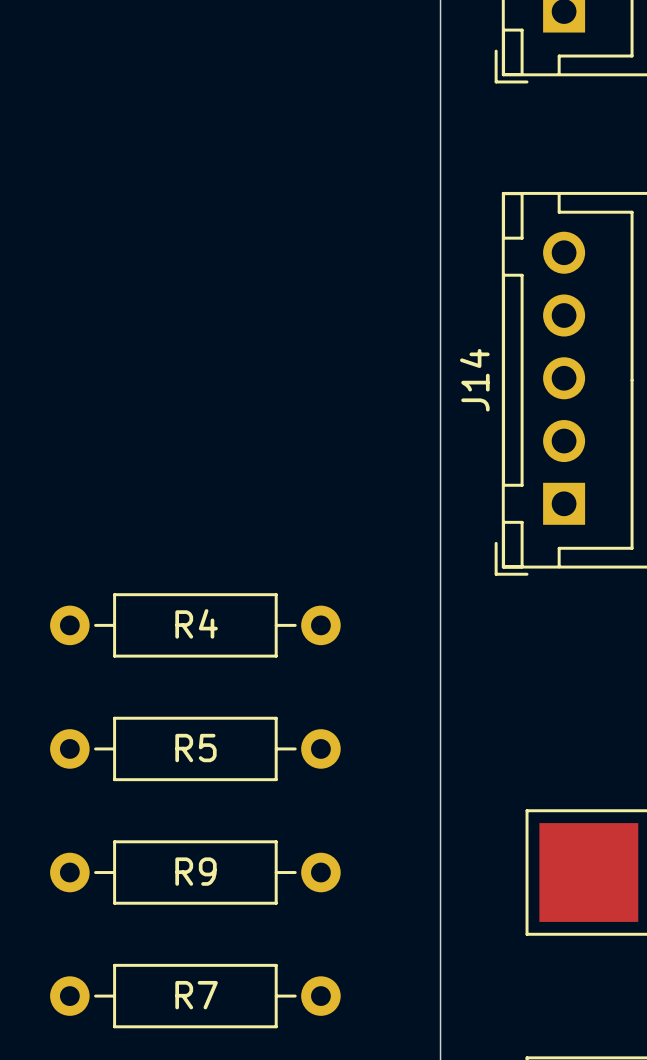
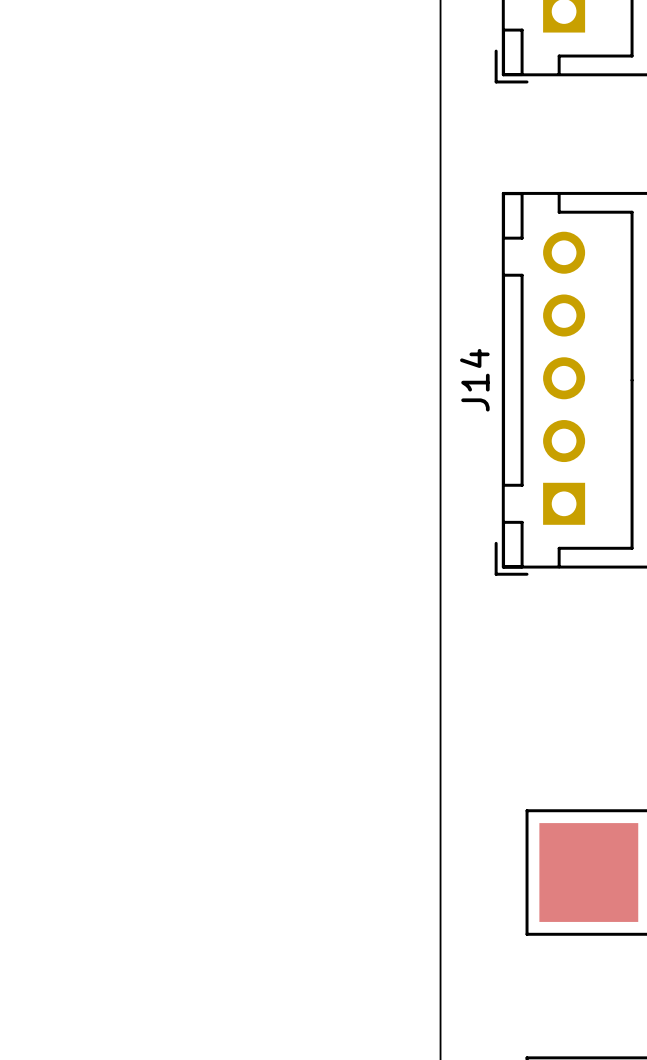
R4: (195, 625) -> none
R5: (195, 748) -> none
R9: (195, 872) -> none
R7: (195, 996) -> none

